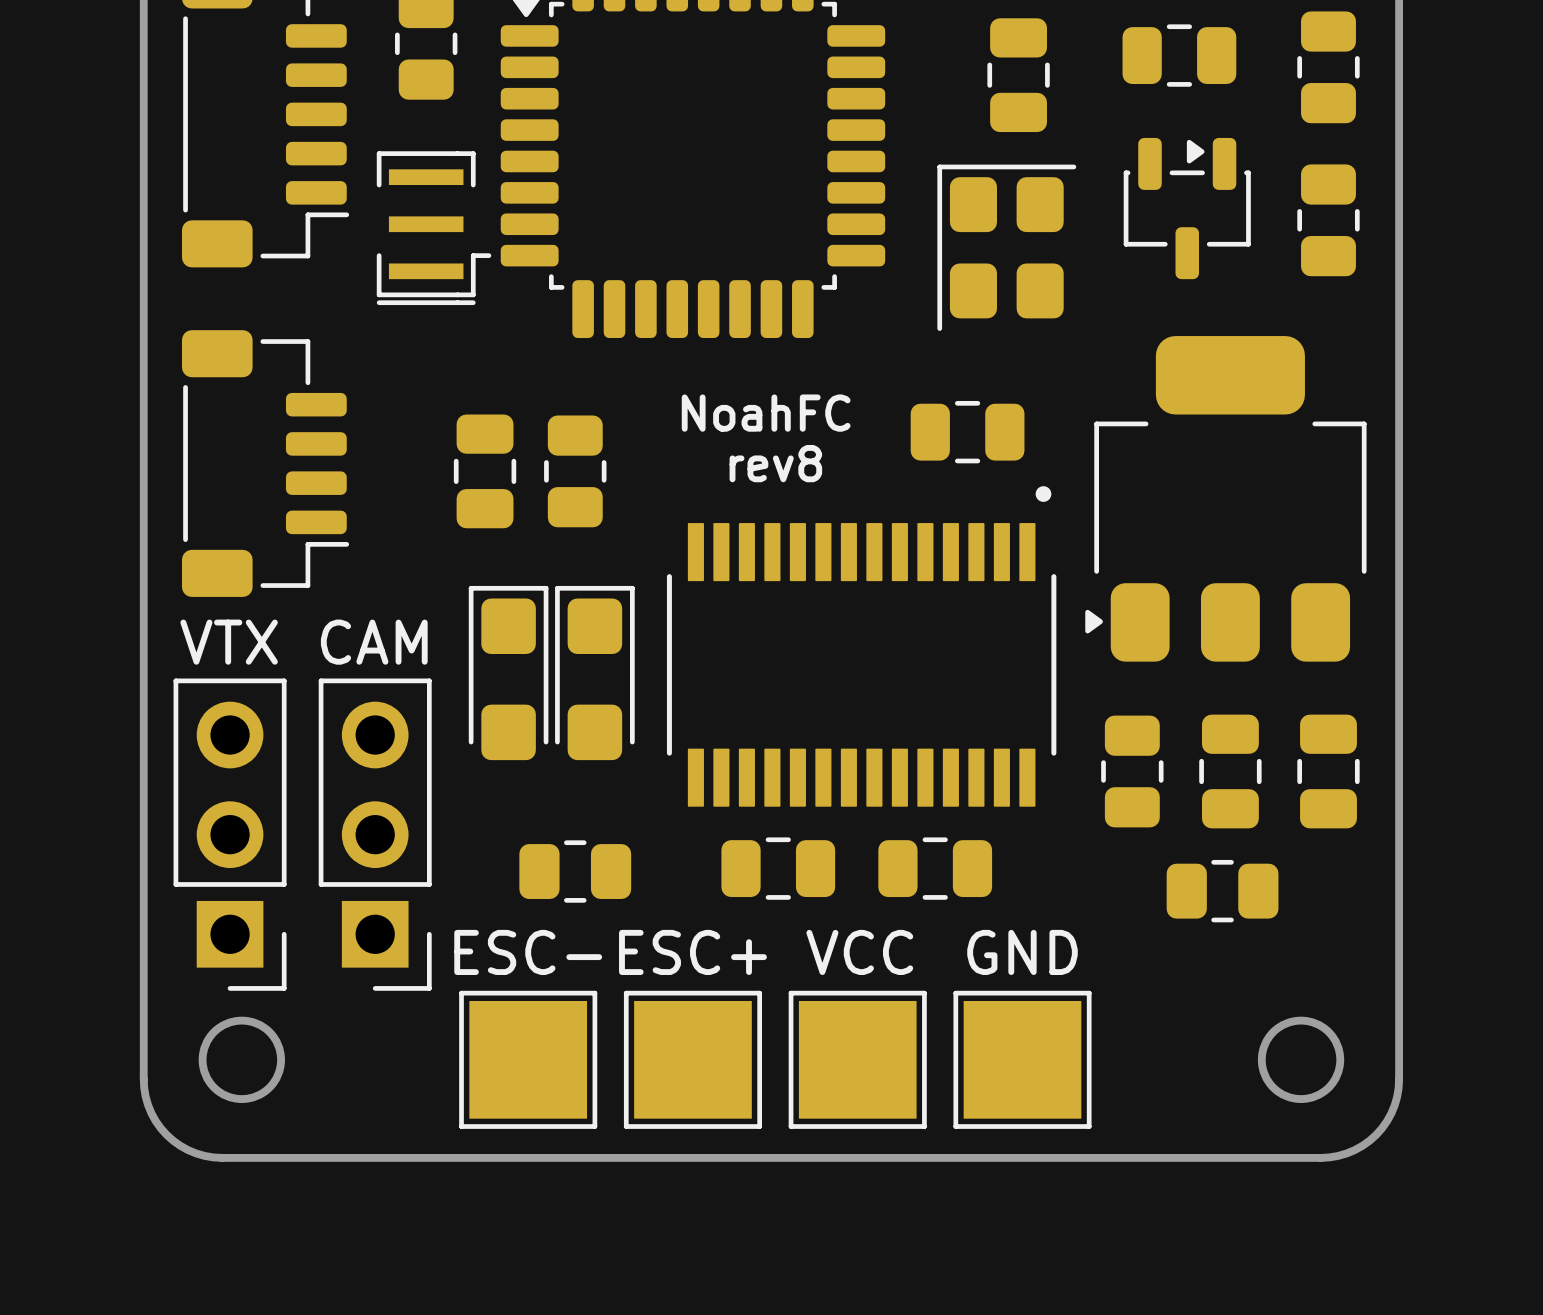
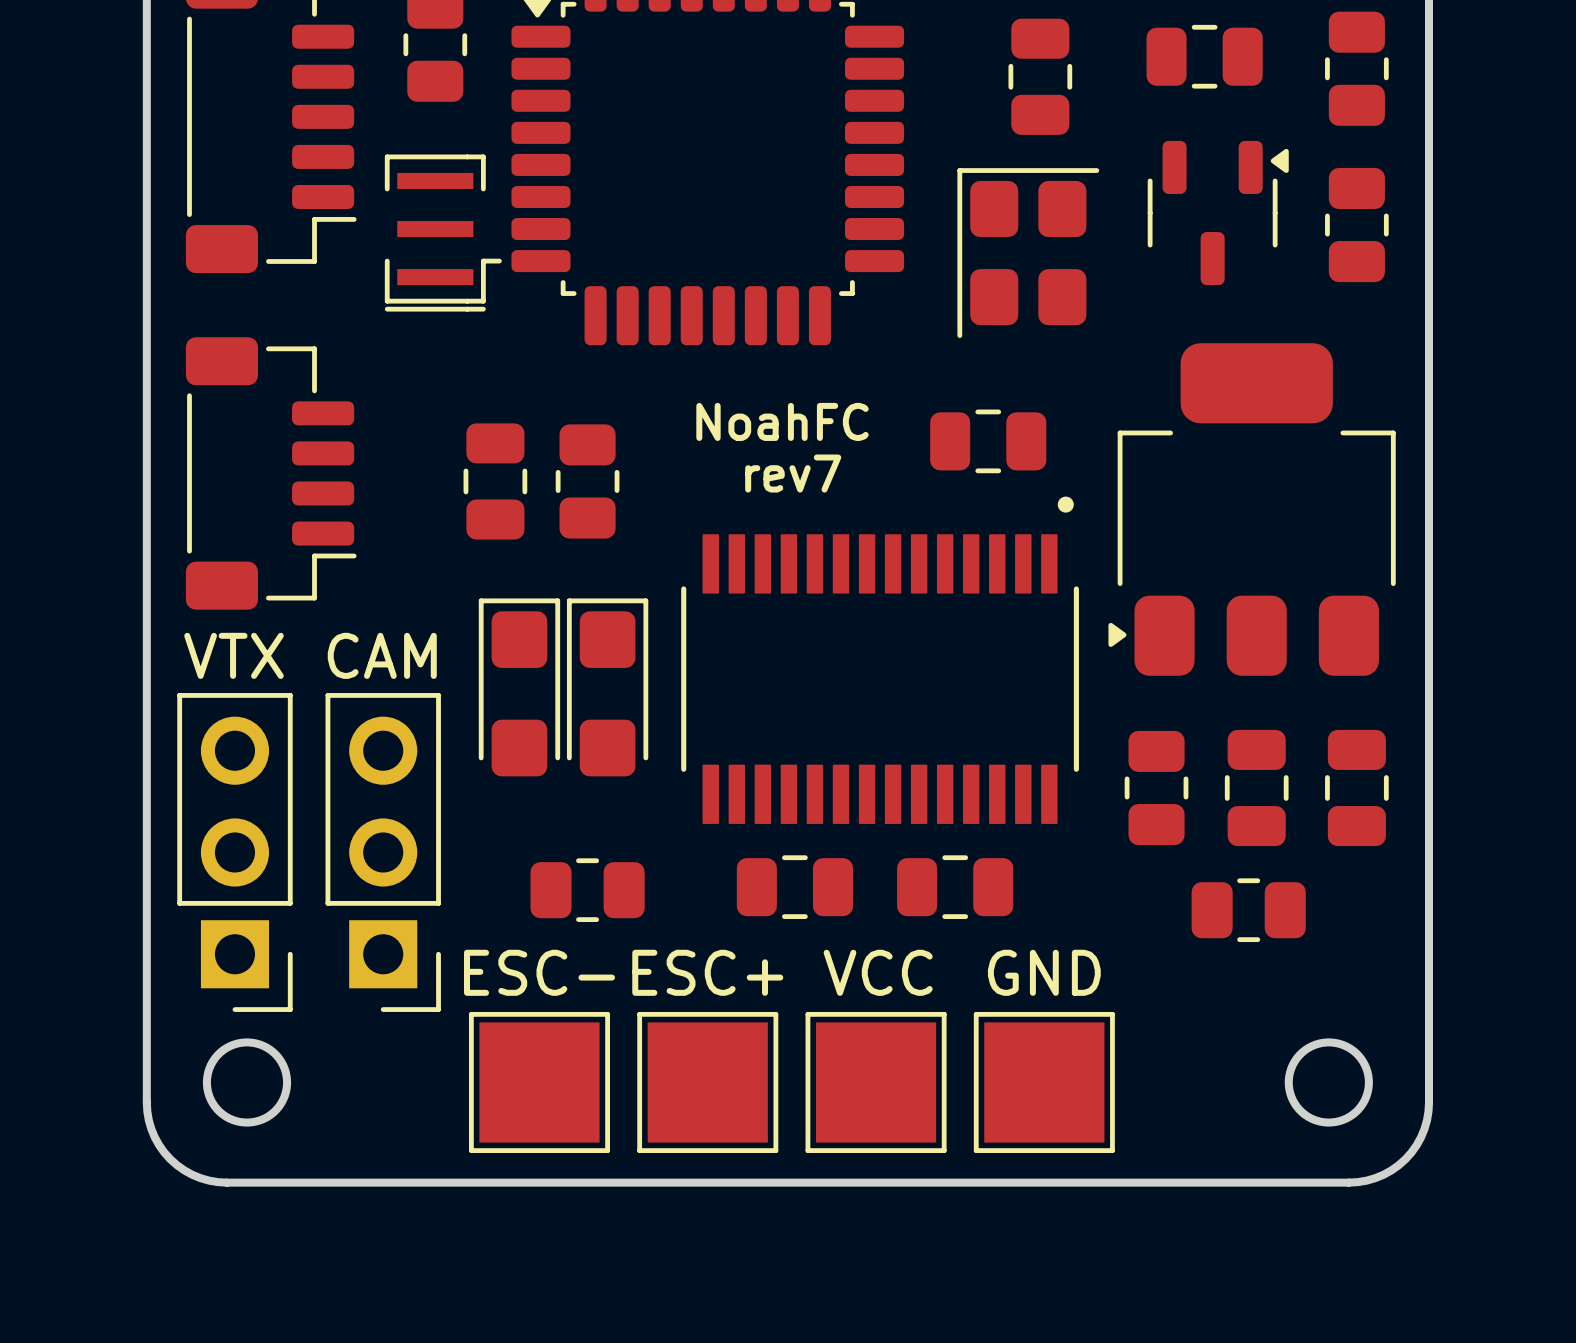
part footprint: [1123, 137, 1251, 280] -> [1147, 140, 1289, 286]
text: rev8 (775, 463) -> rev7 (793, 473)

